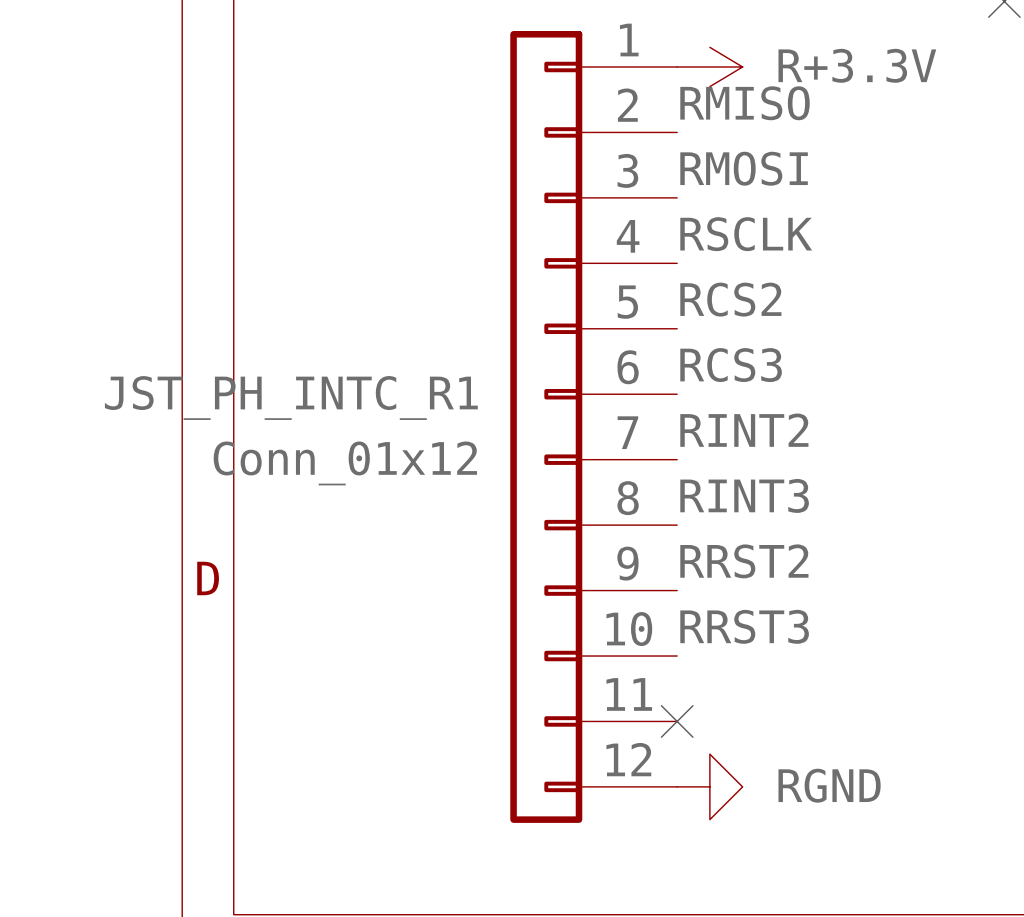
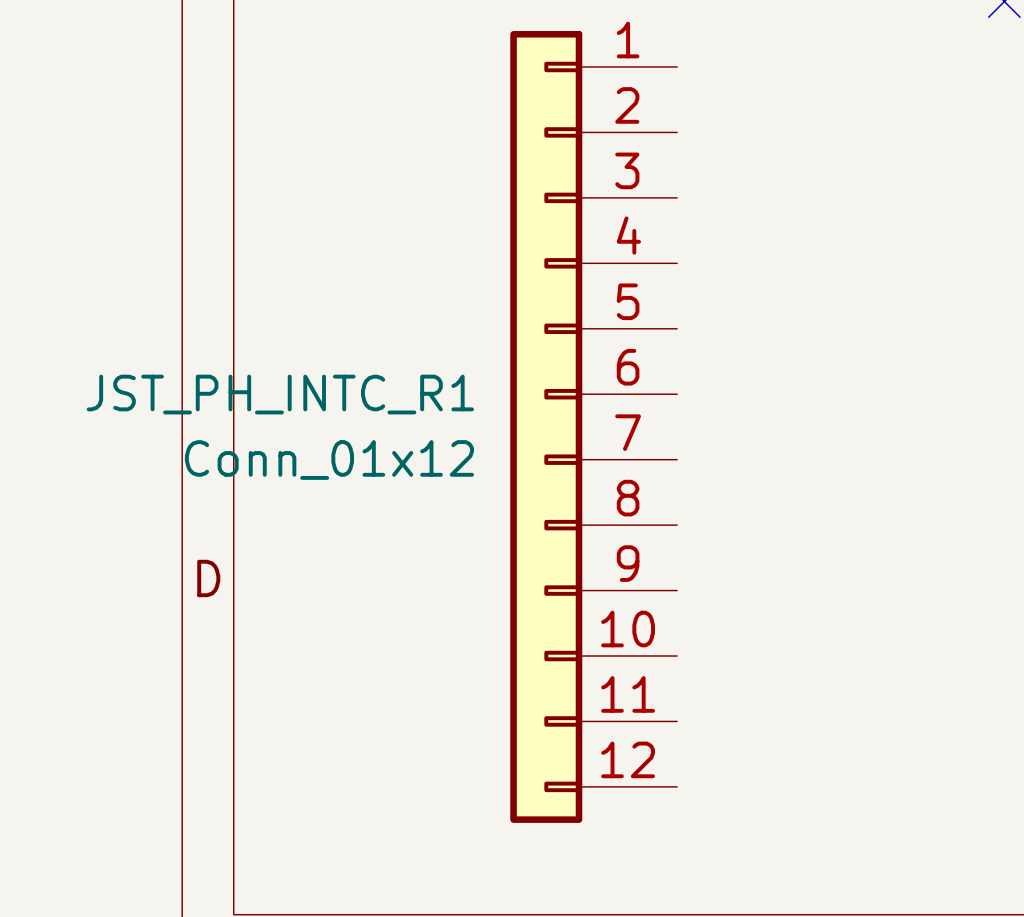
power symbol: R+3.3V (709, 66) -> none
label: RMISO (745, 103) -> none
label: RMOSI (744, 168) -> none
label: RSCLK (746, 234) -> none
label: RCS2 (730, 299) -> none
label: RCS3 (731, 365) -> none
label: RINT2 (744, 430) -> none
label: RINT3 (744, 495) -> none
label: RRST2 (744, 561) -> none
label: RRST3 (744, 626) -> none
no-connect mark: (677, 721) -> none
power symbol: RGND (709, 786) -> none

